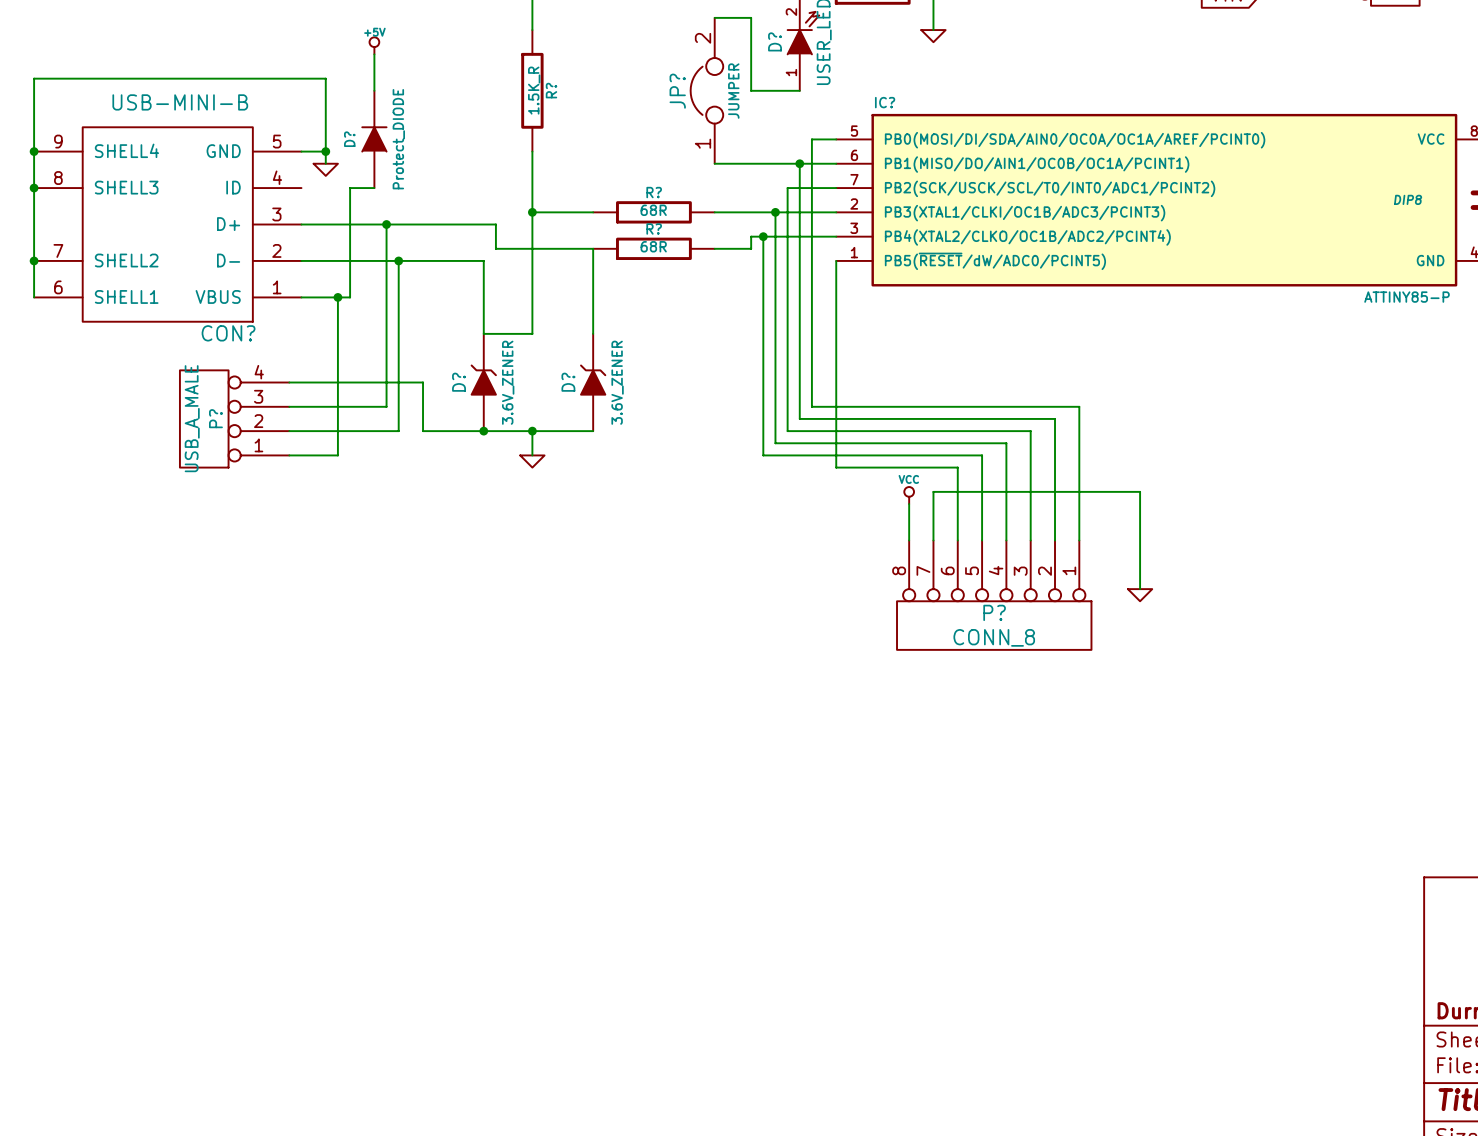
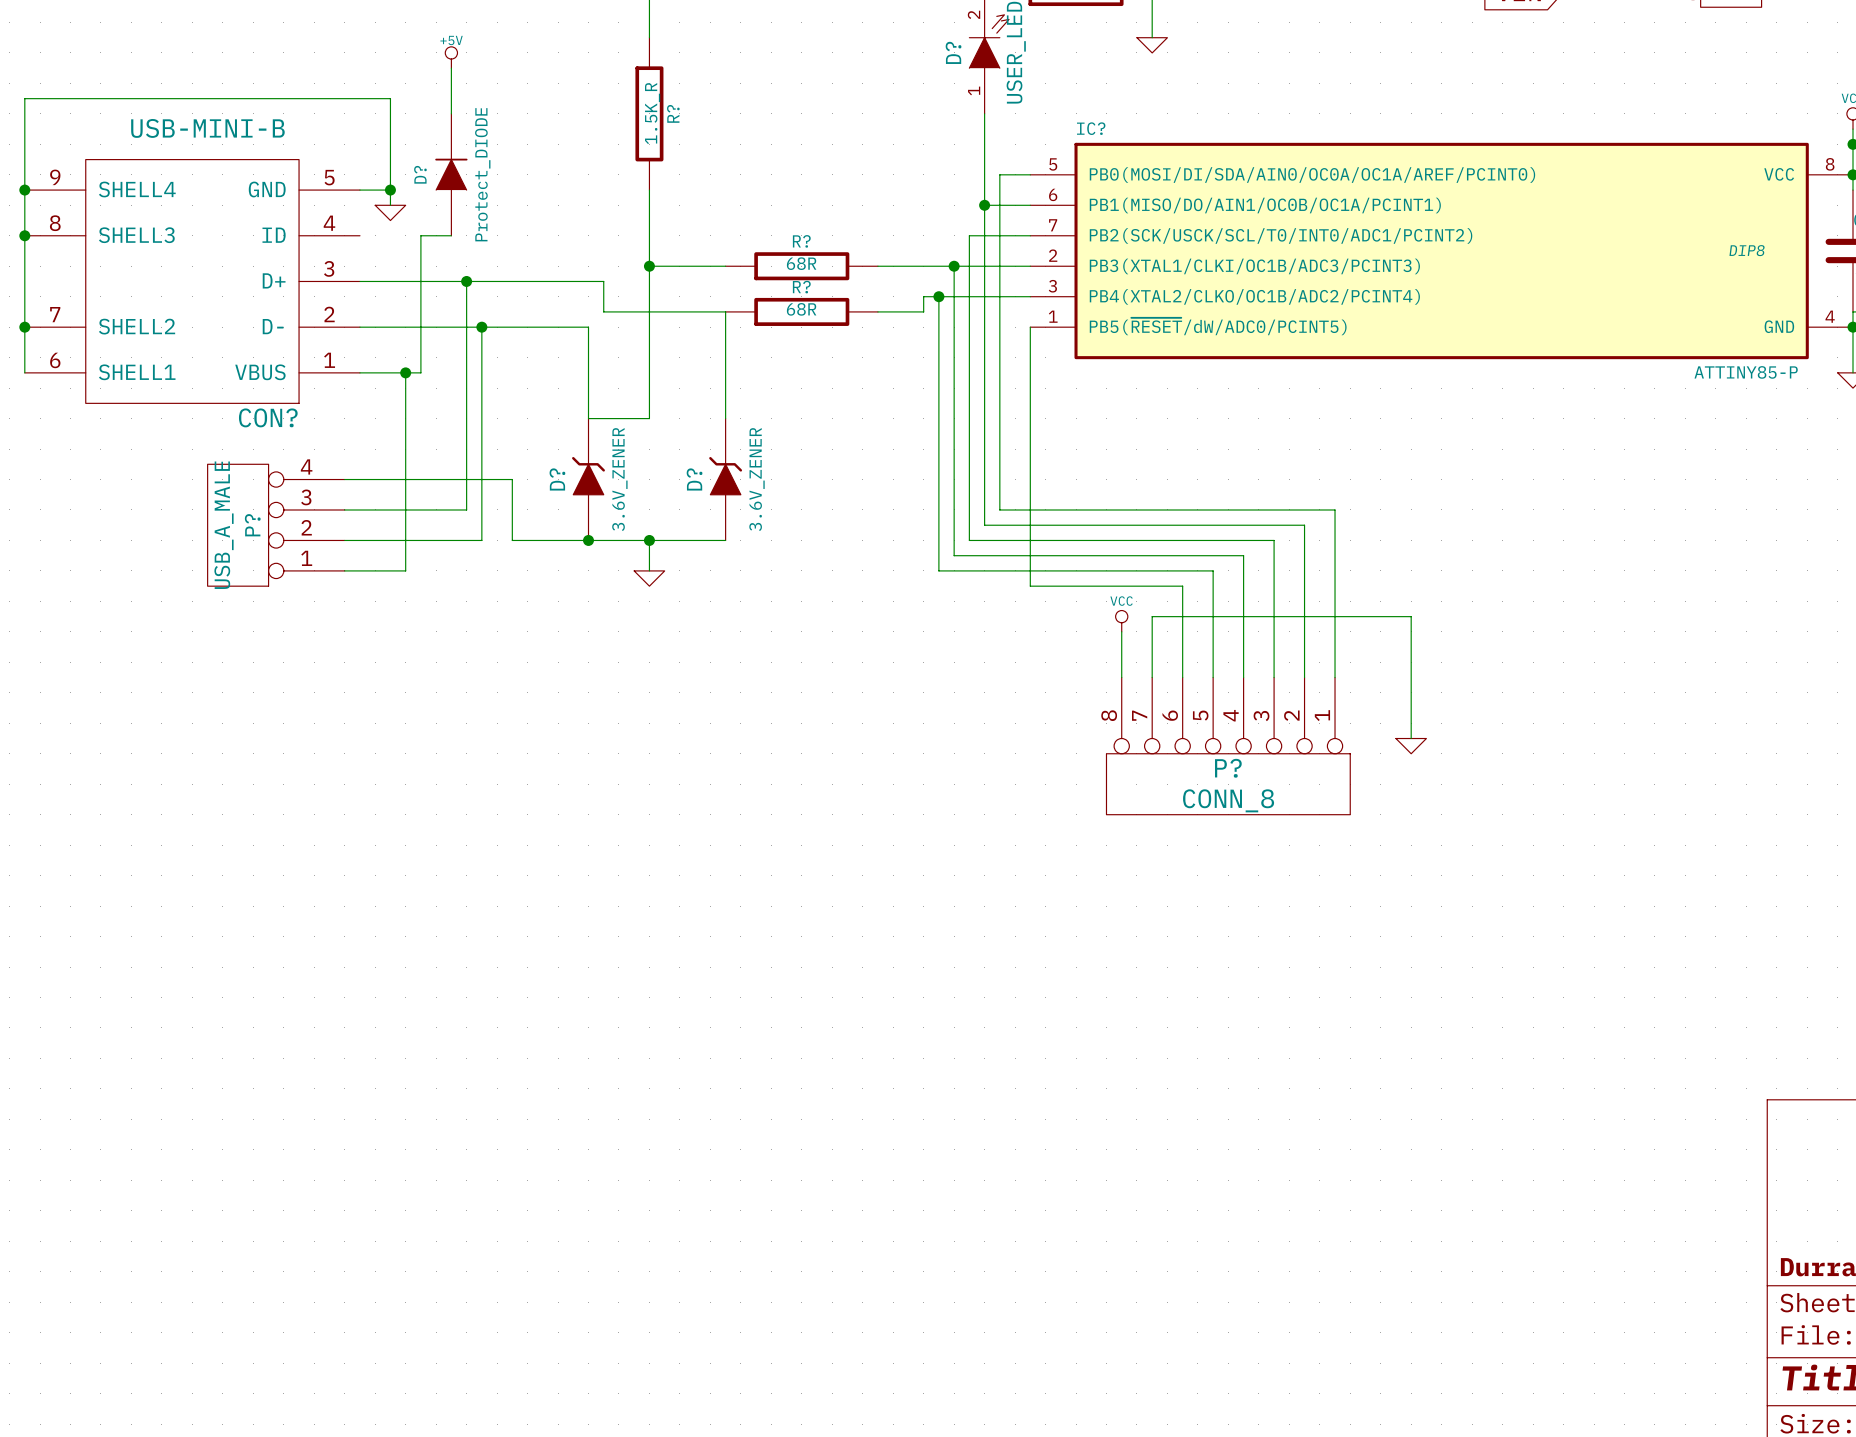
wire: (714, 17) (751, 17) (751, 90) (799, 90) -> none
JP?: JUMPER (706, 90) -> none
wire: (714, 163) (799, 163) -> (984, 113) (984, 205)

